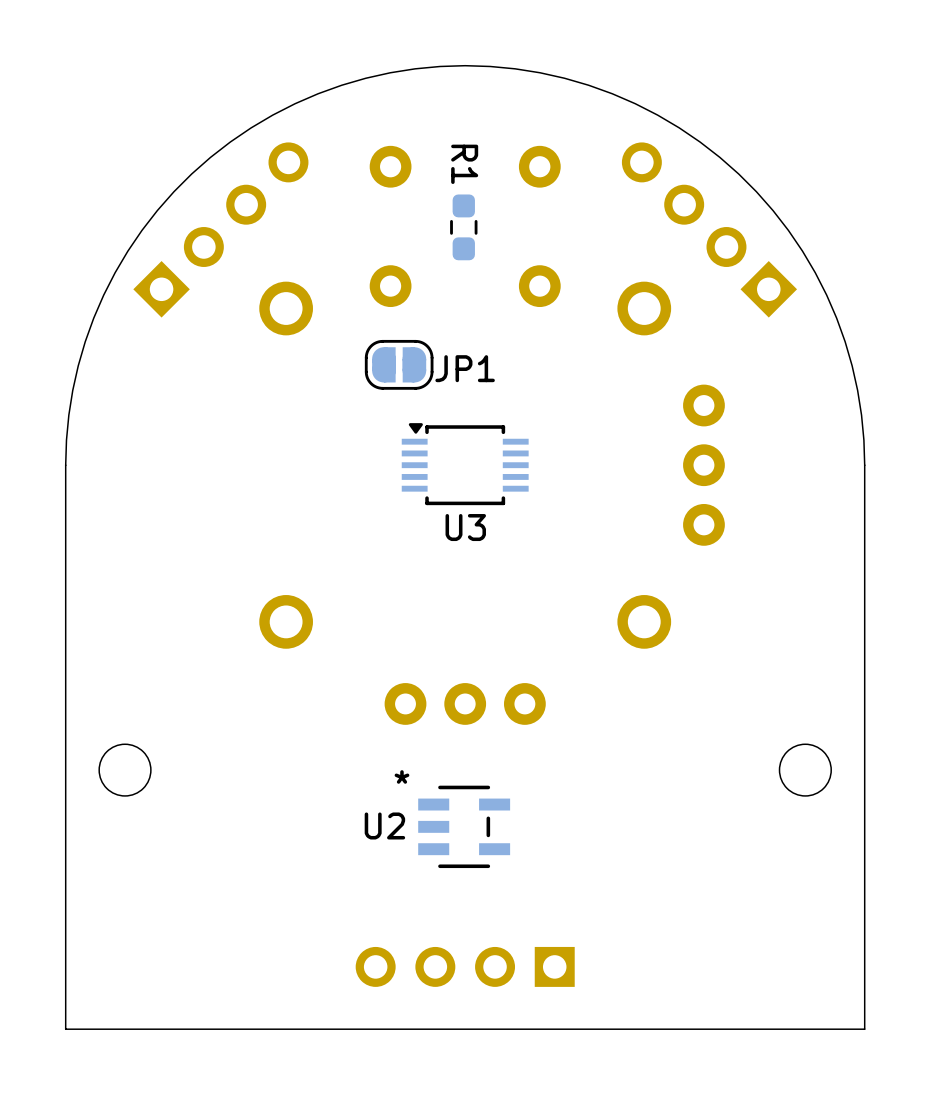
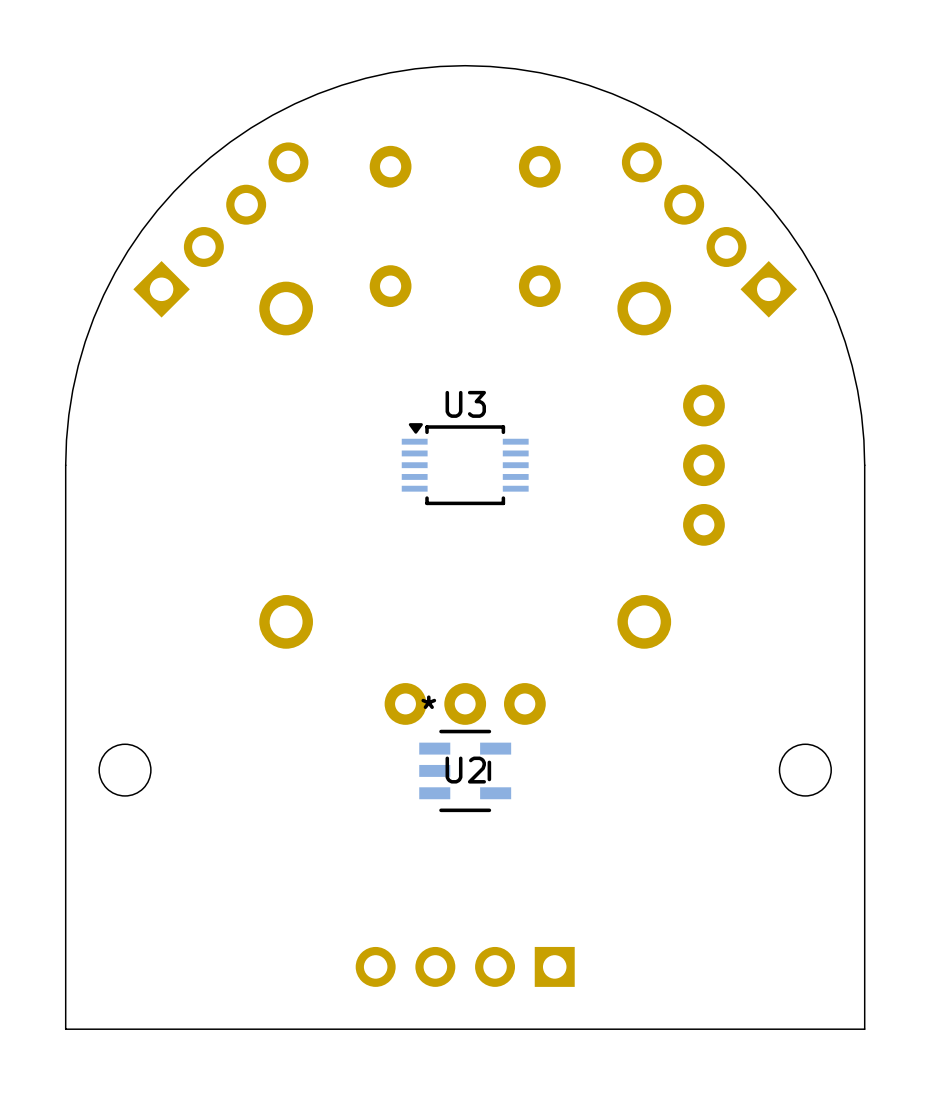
R1: (463, 227) -> none
JP1: (399, 364) -> none
U3 name position: U3 (465, 527) -> U3 (465, 404)
U2 text position: * (401, 776) -> * (428, 702)
U2 name position: U2 (384, 825) -> U2 (465, 770)
U2 position: (464, 826) -> (465, 770)

